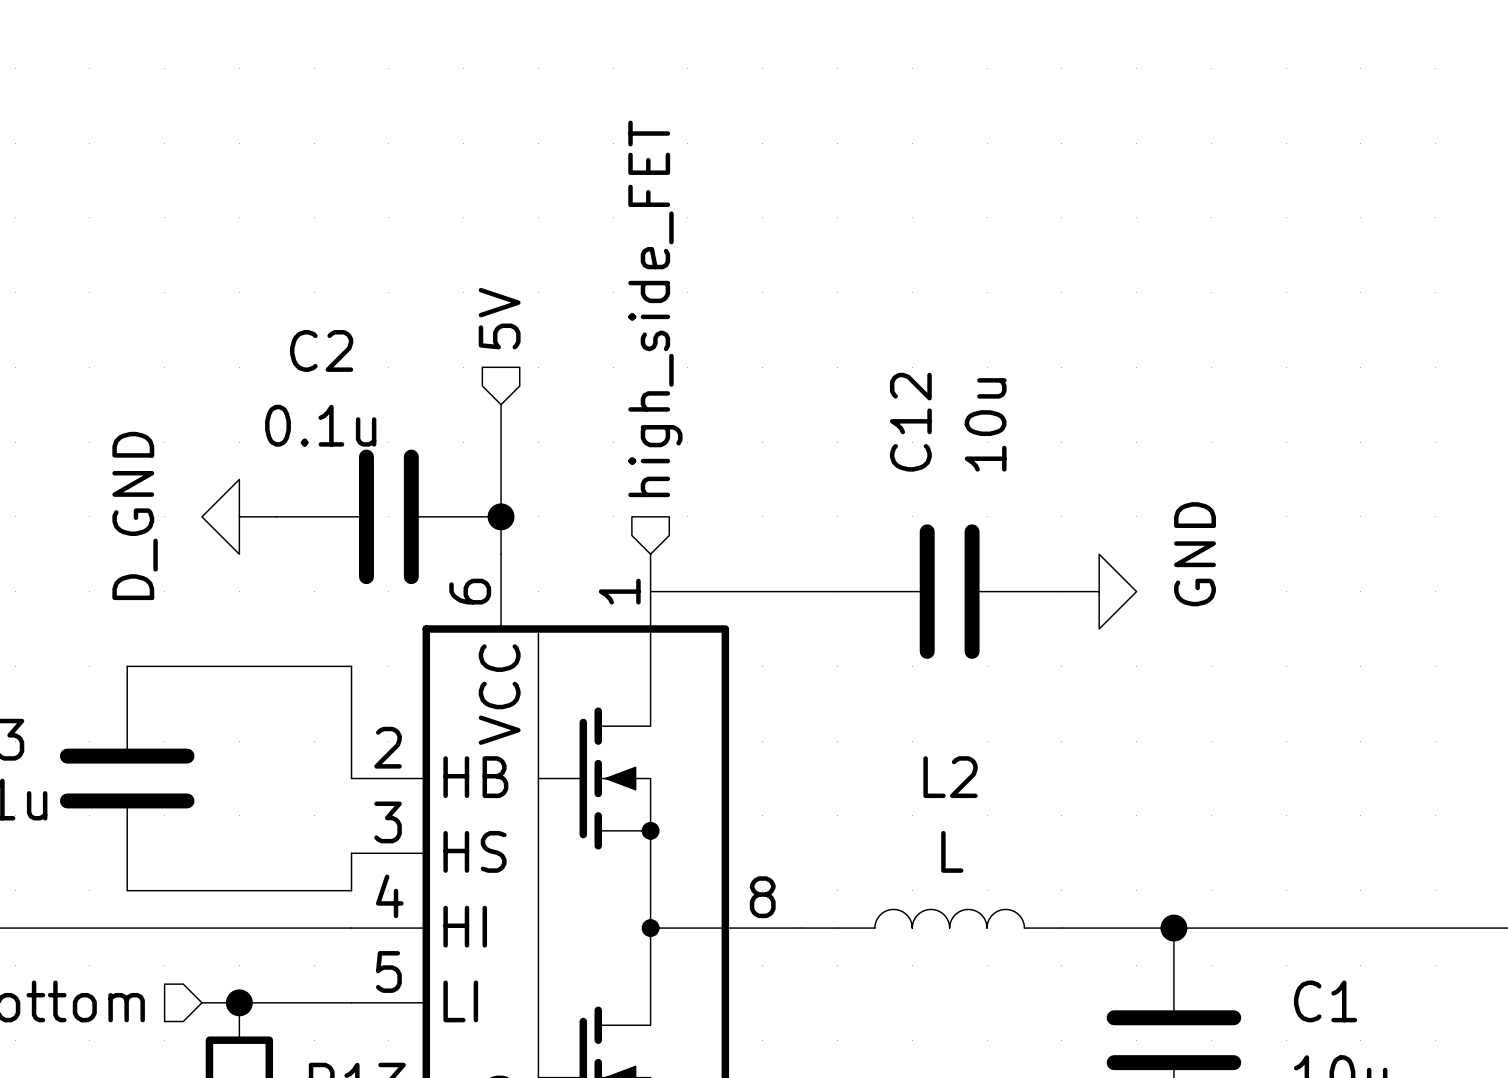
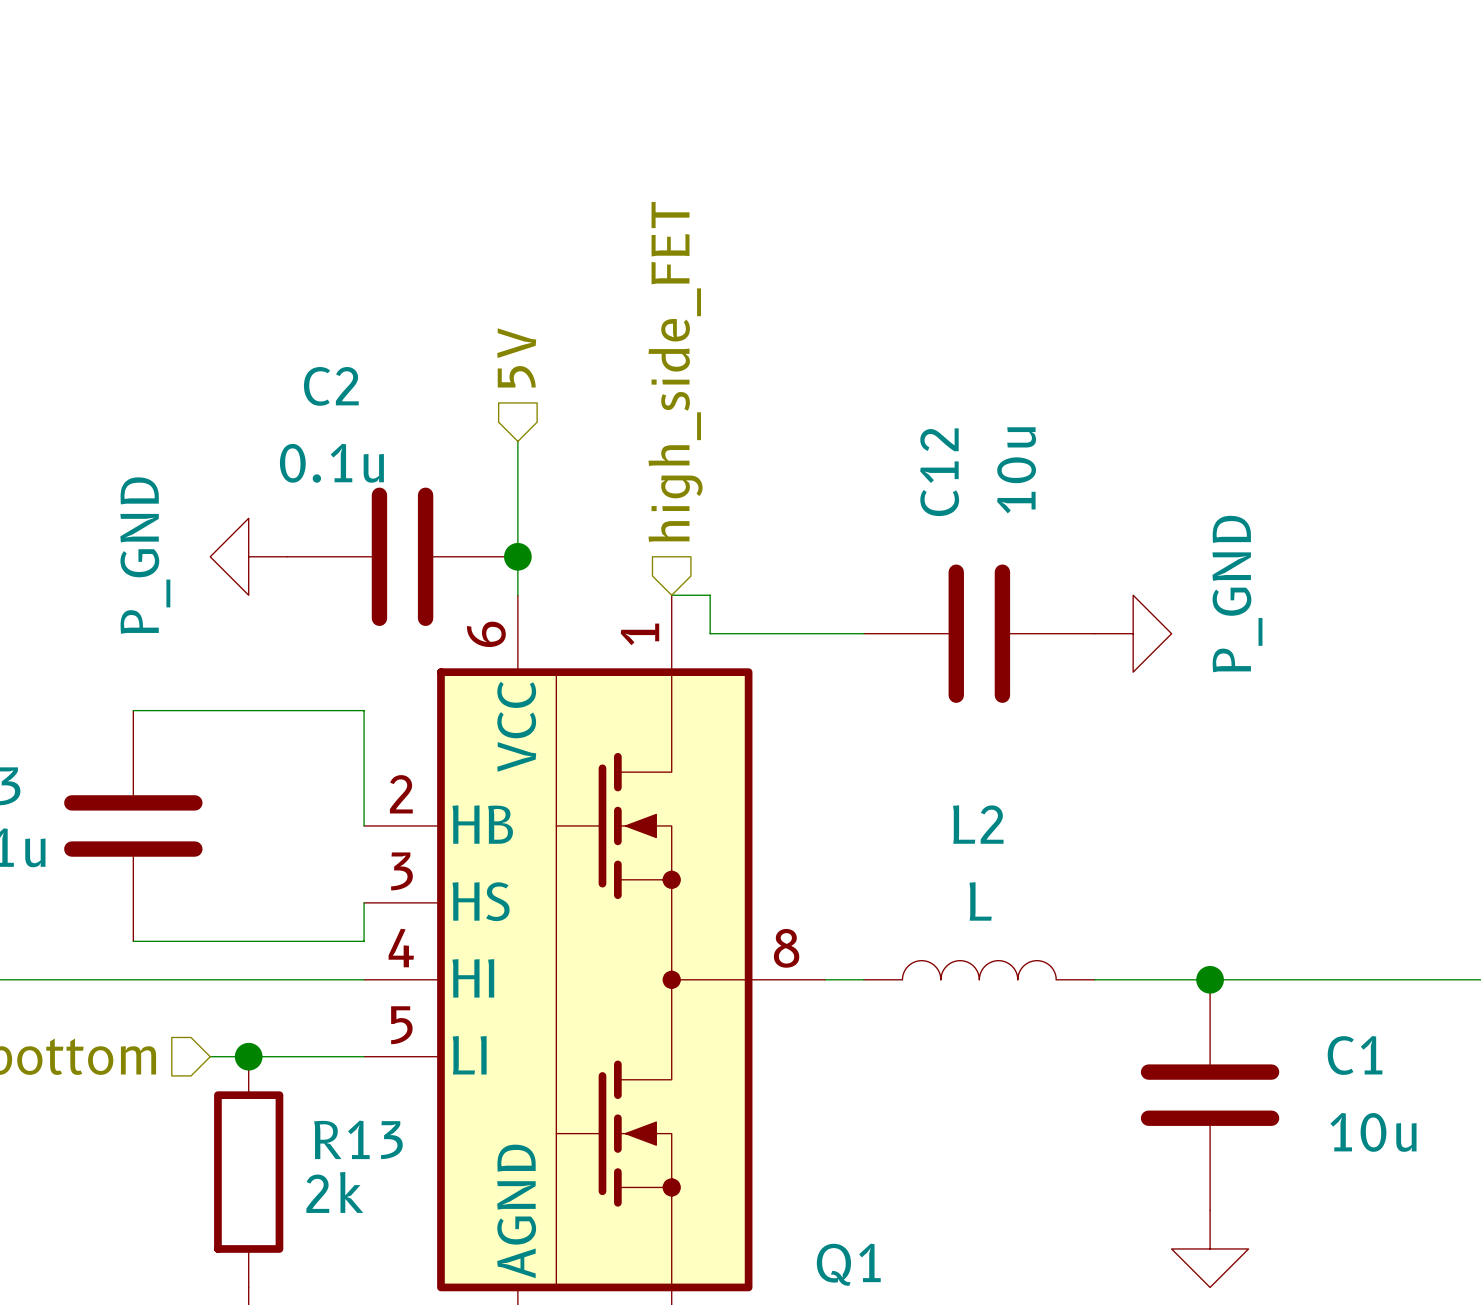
power symbol: D_GND (239, 516) -> P_GND (248, 556)
wire: (650, 591) (687, 591) -> (671, 595) (710, 595) (710, 633)
power symbol: GND (1099, 591) -> P_GND (1133, 633)

